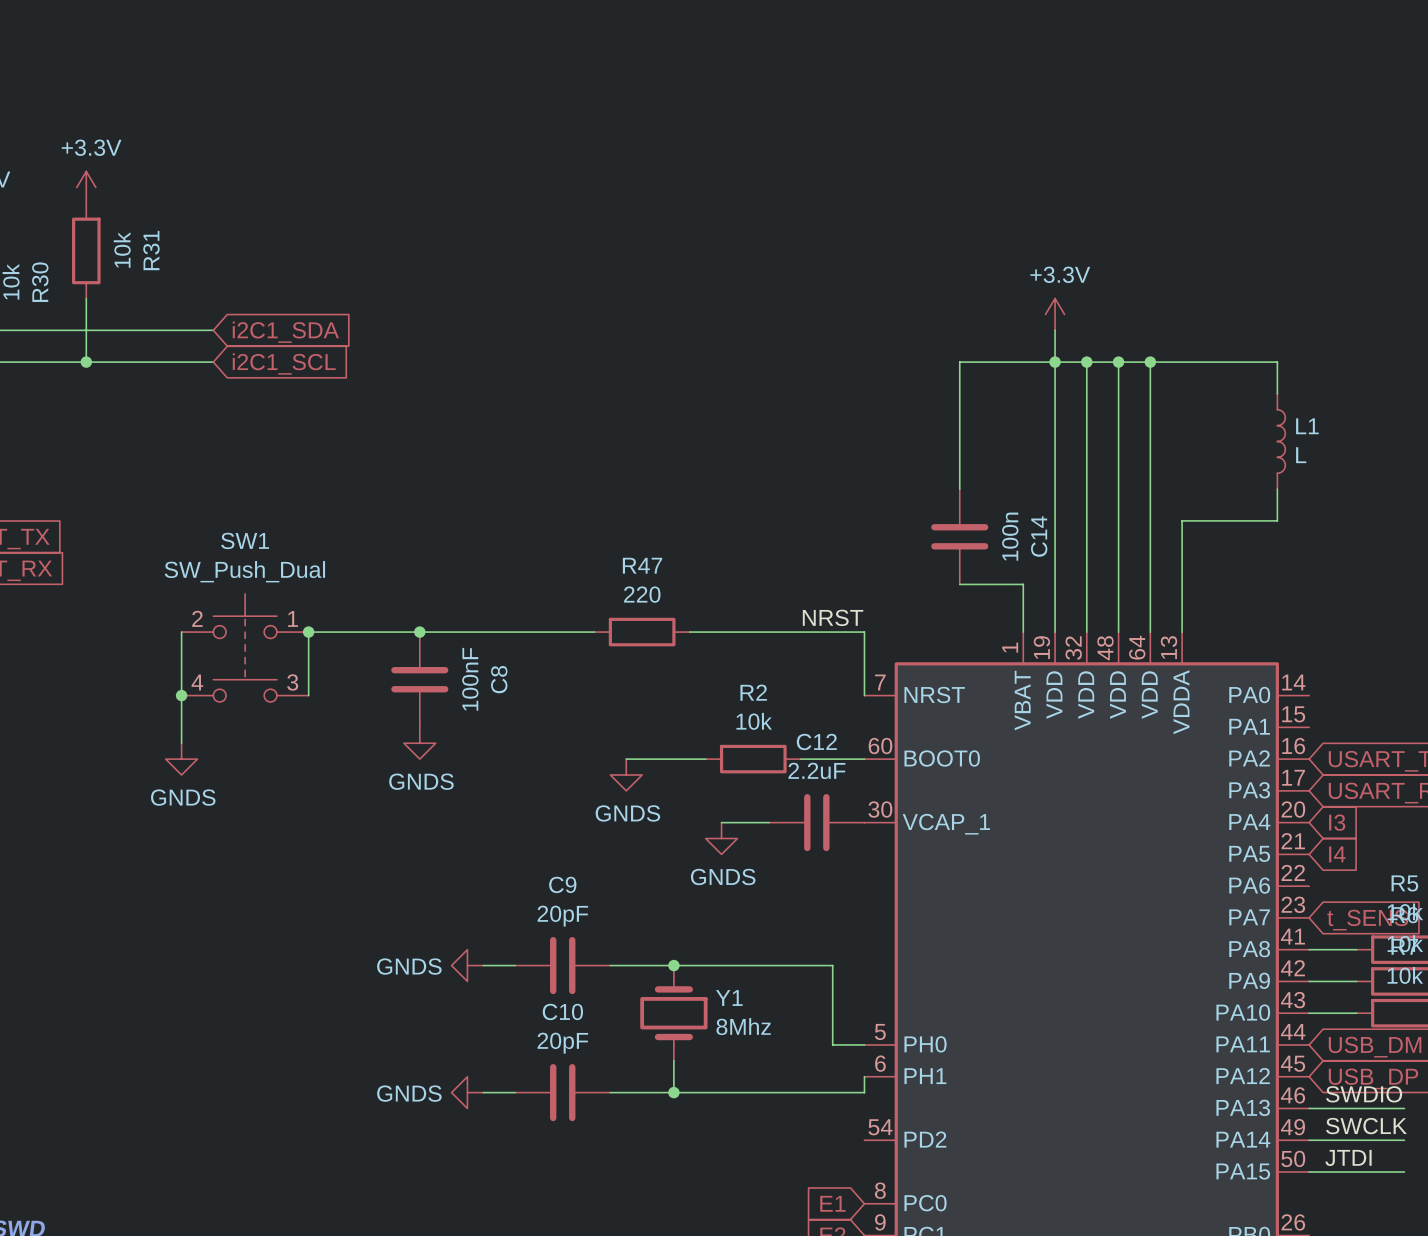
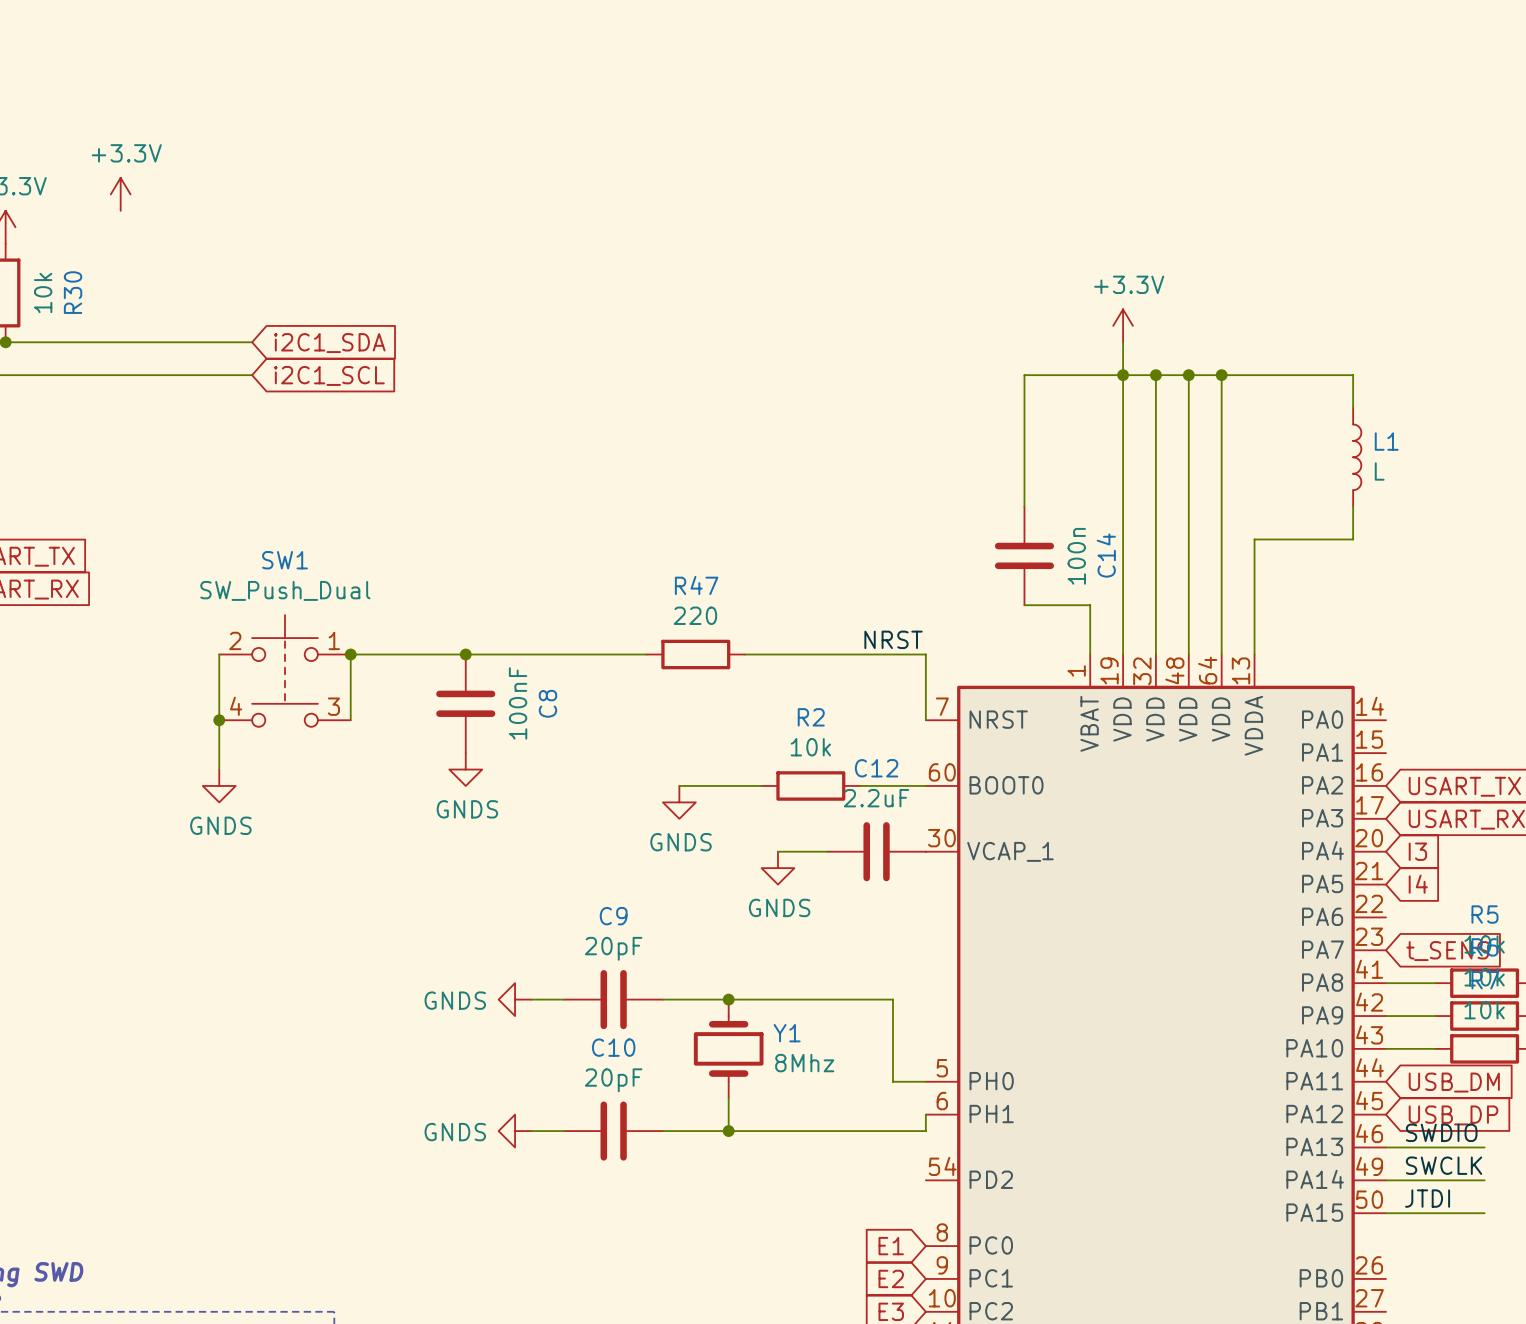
R31: 10k (86, 250) -> none
wire: (86, 298) (86, 362) -> none
junction: (86, 362) -> none

